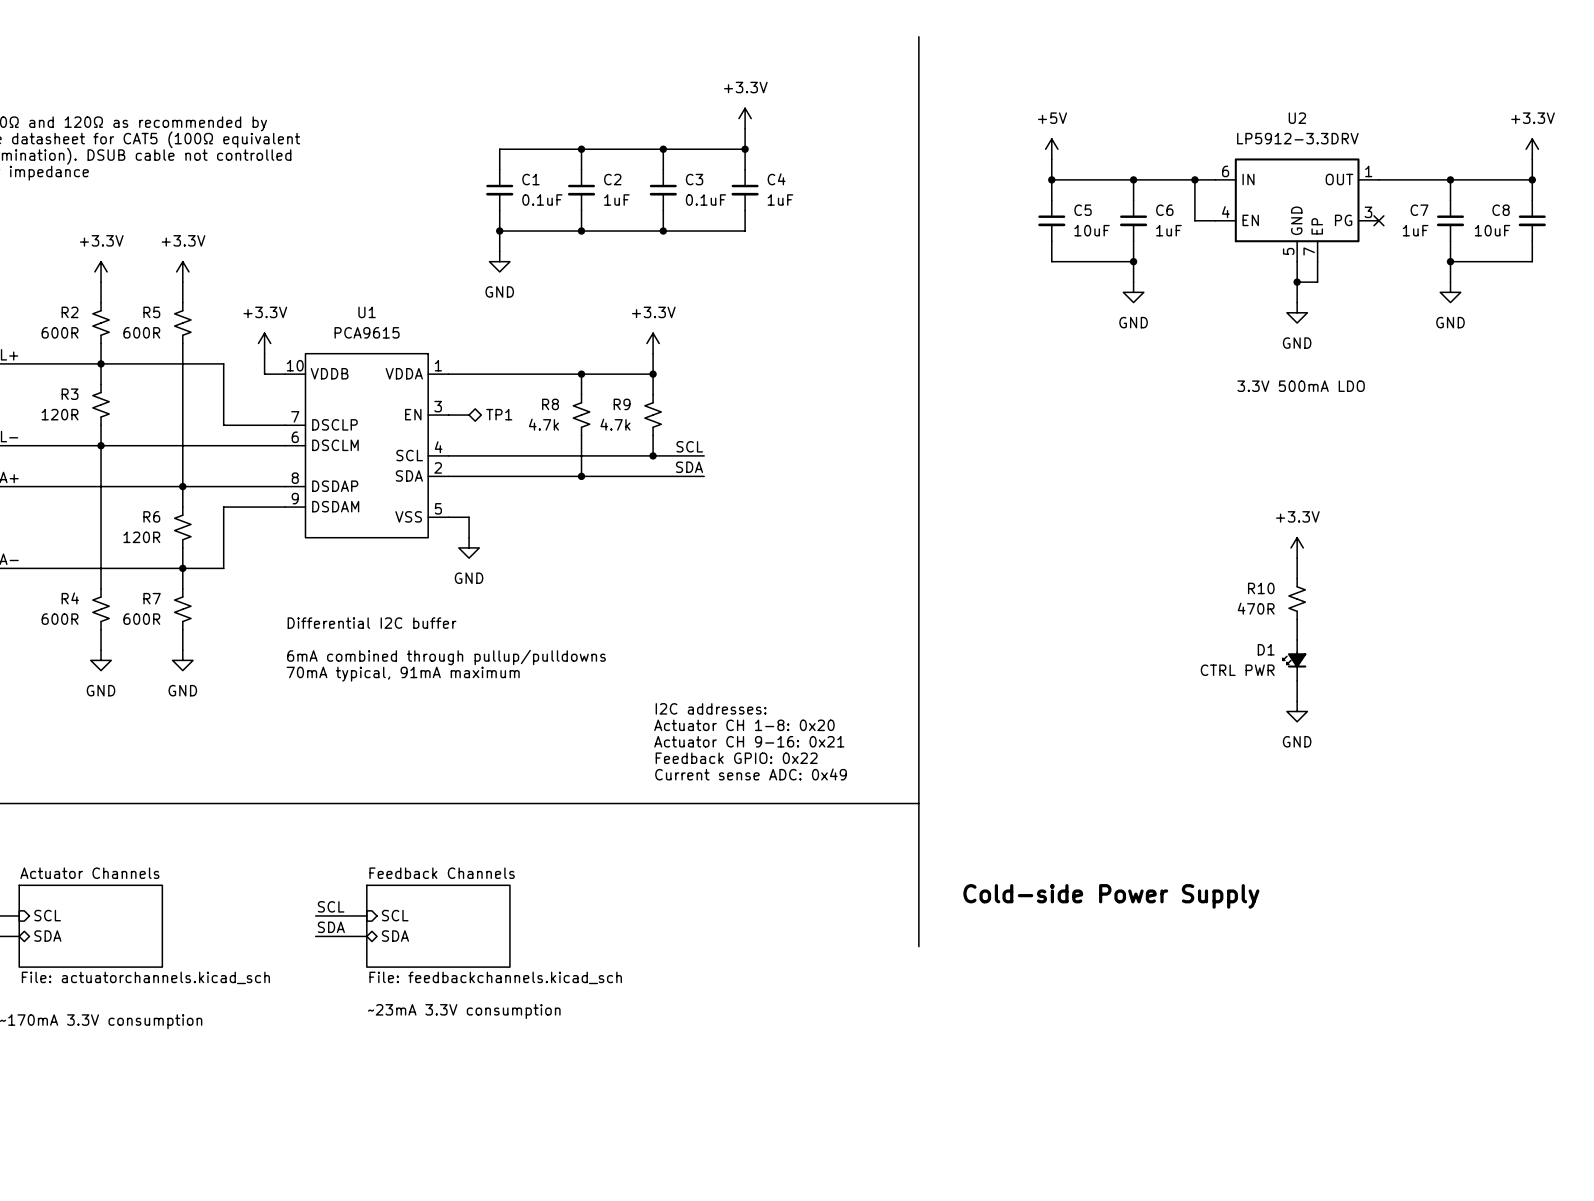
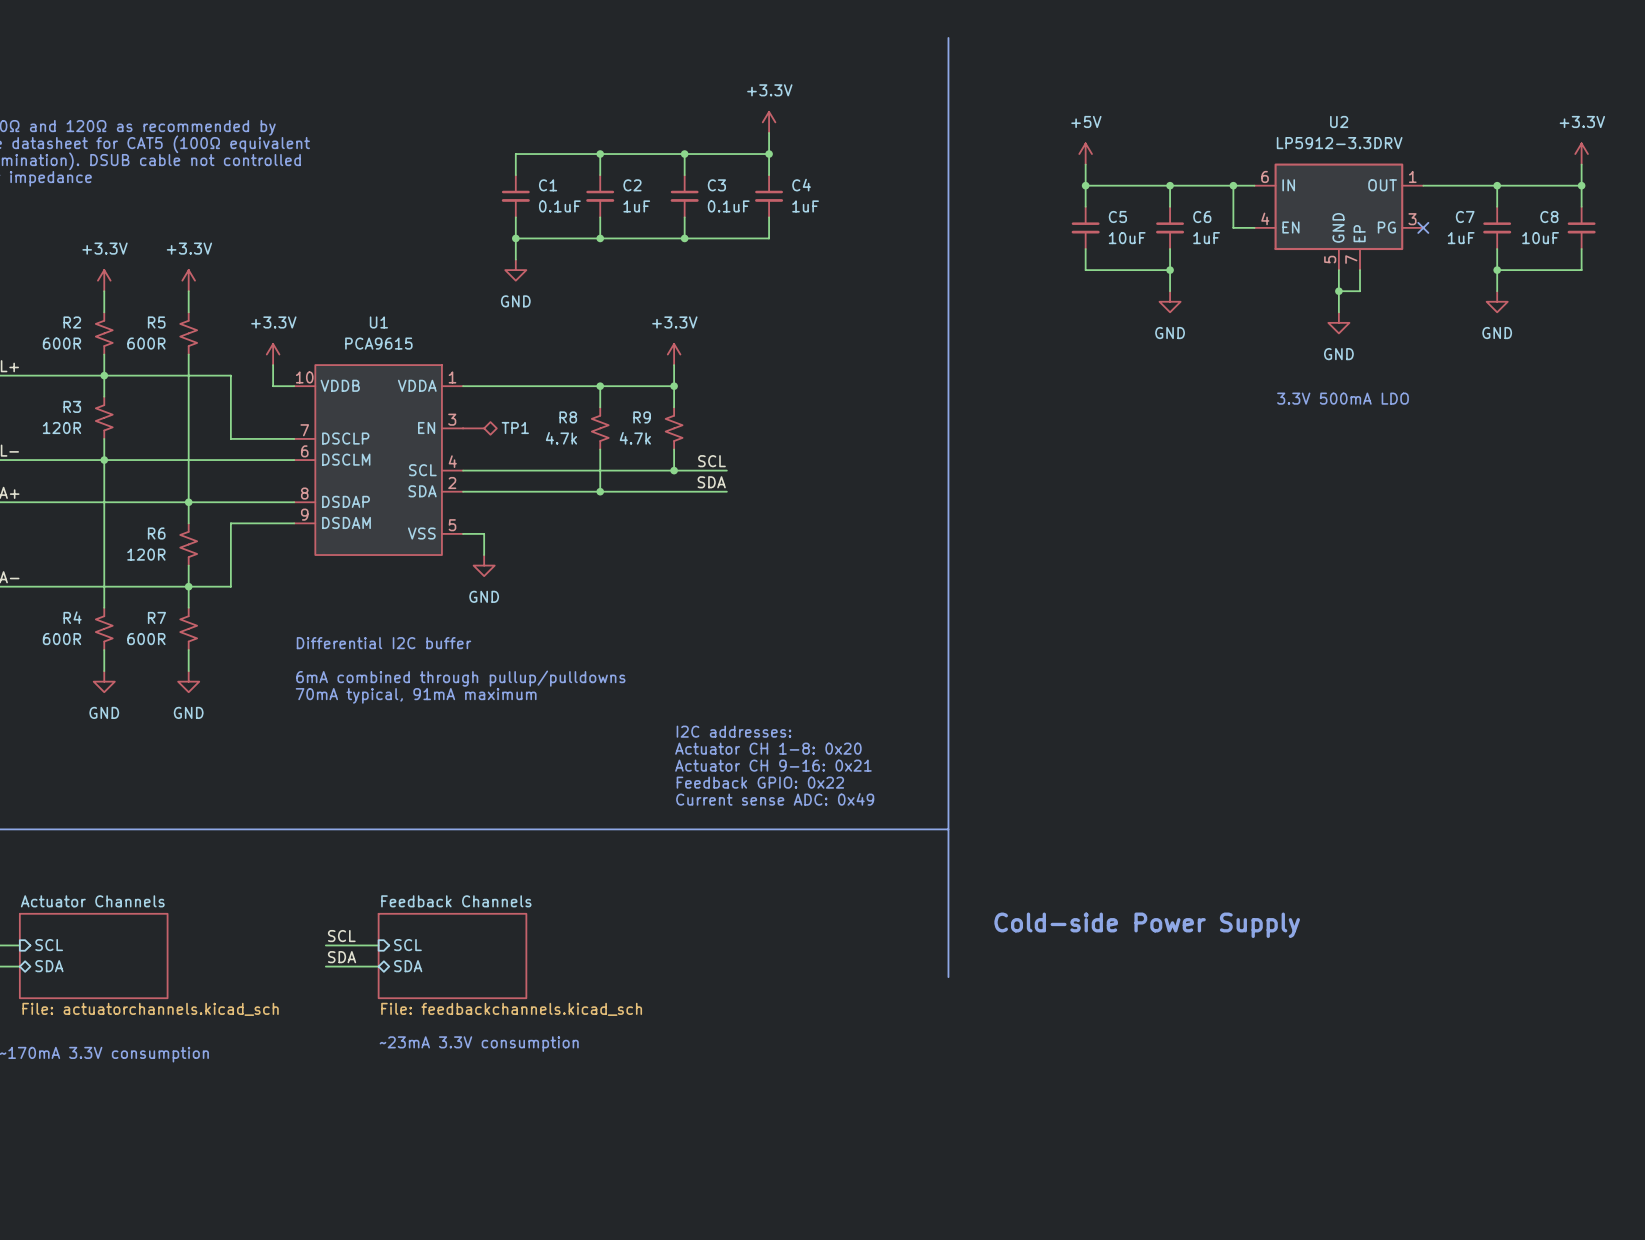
power symbol: +3.3V (1297, 547) -> none
wire: (1297, 558) (1297, 578) -> none
R10: 470R (1297, 599) -> none
wire: (1297, 619) (1297, 639) -> none
D1: CTRL PWR (1294, 660) -> none
wire: (1297, 680) (1297, 701) -> none
power symbol: GND (1297, 711) -> none

